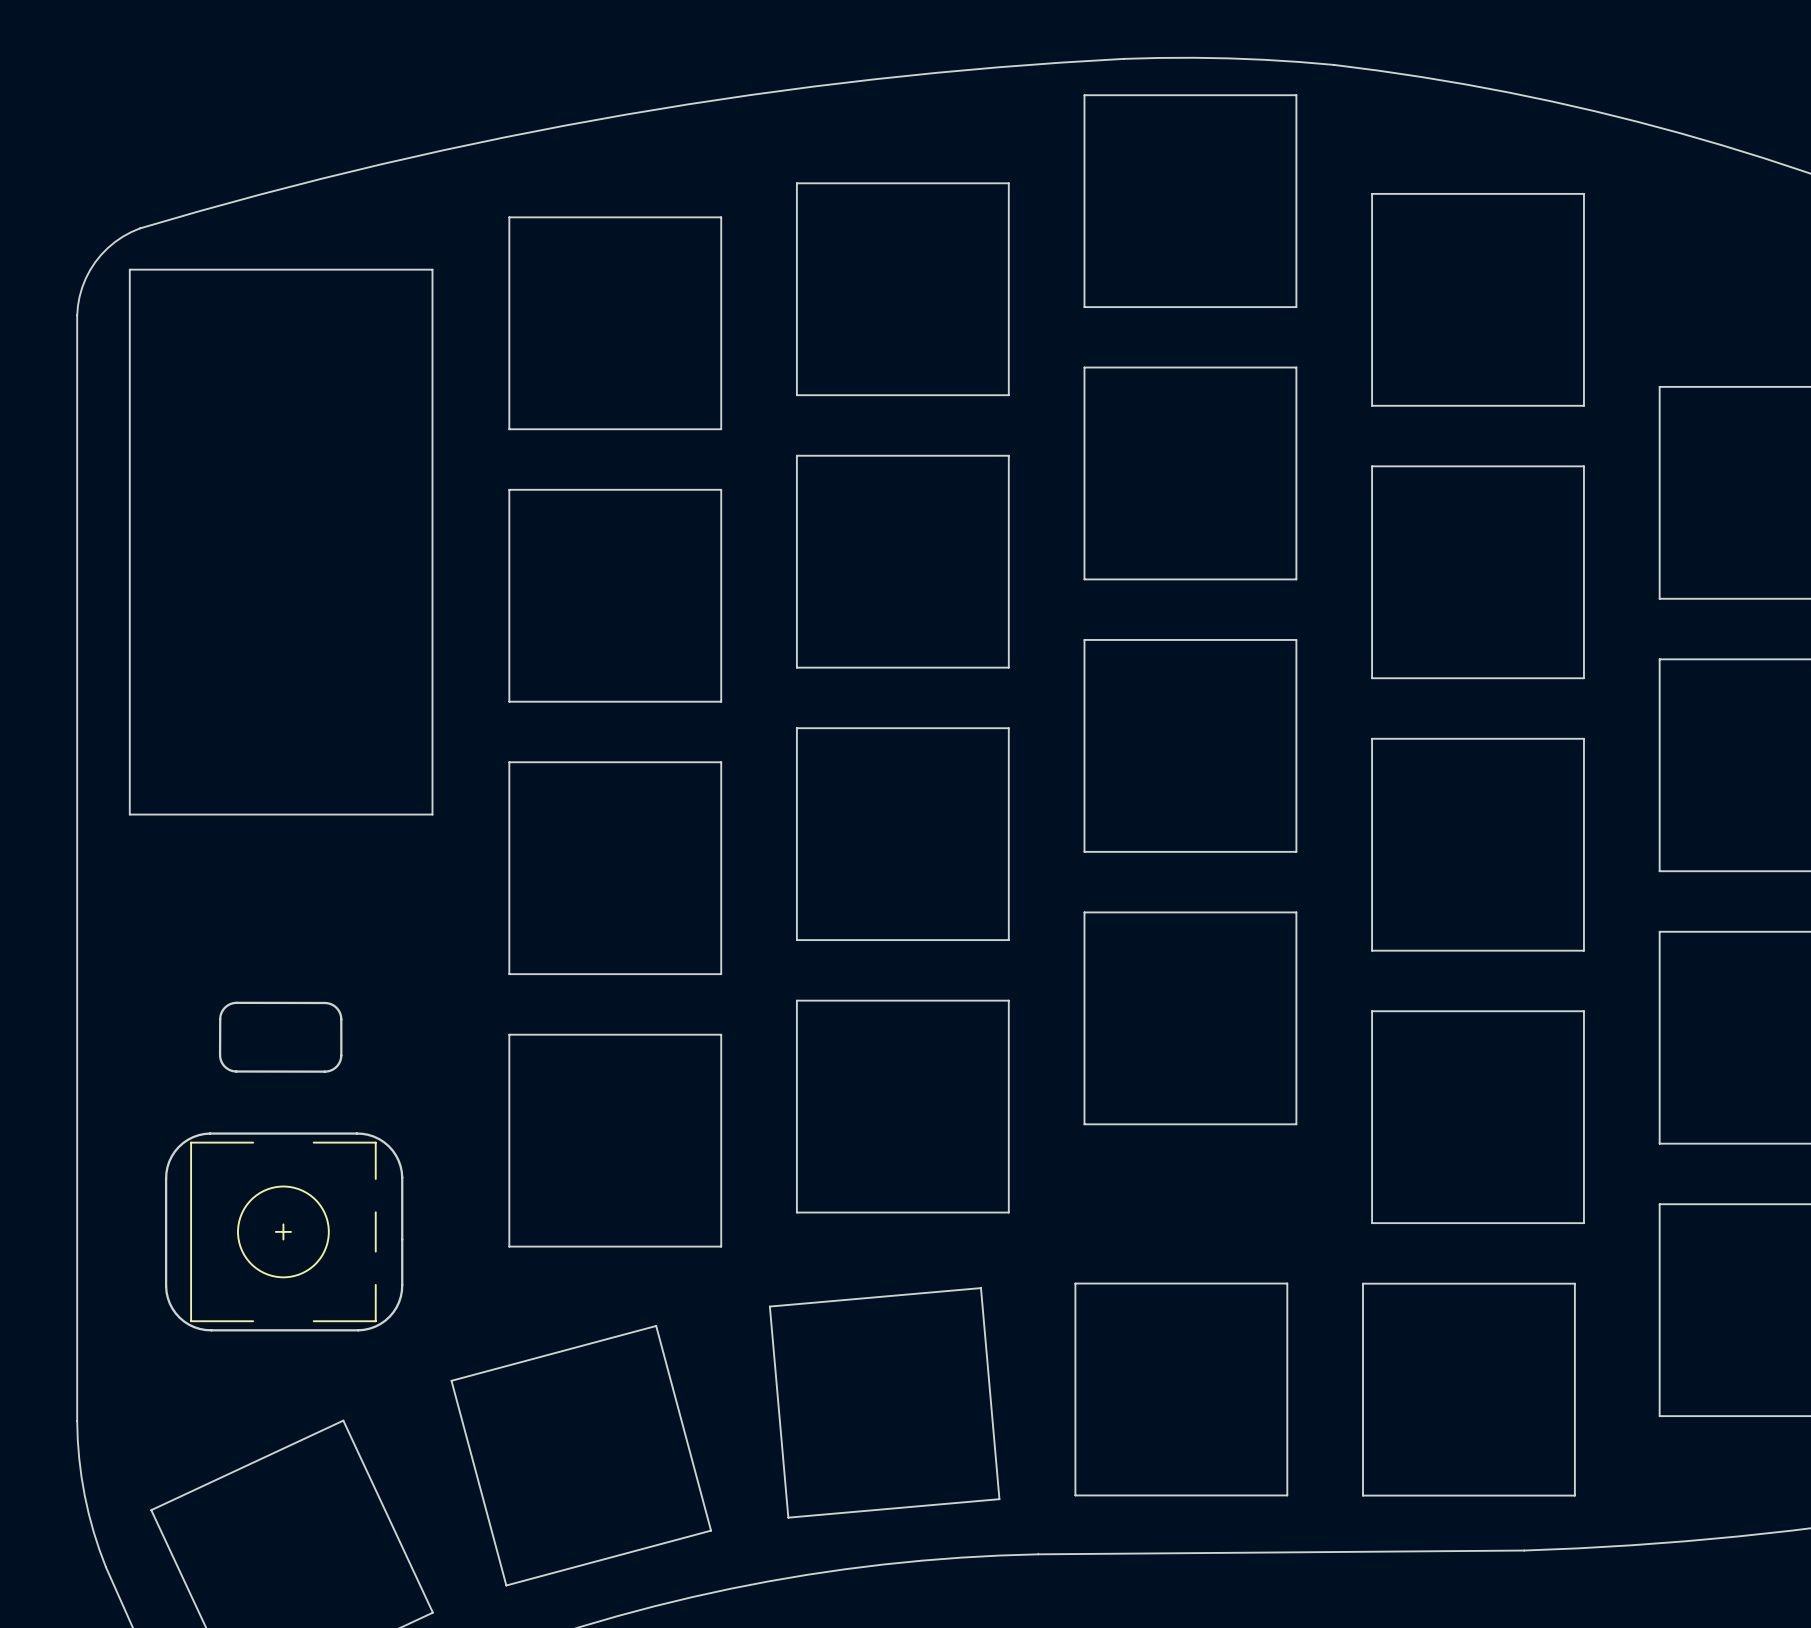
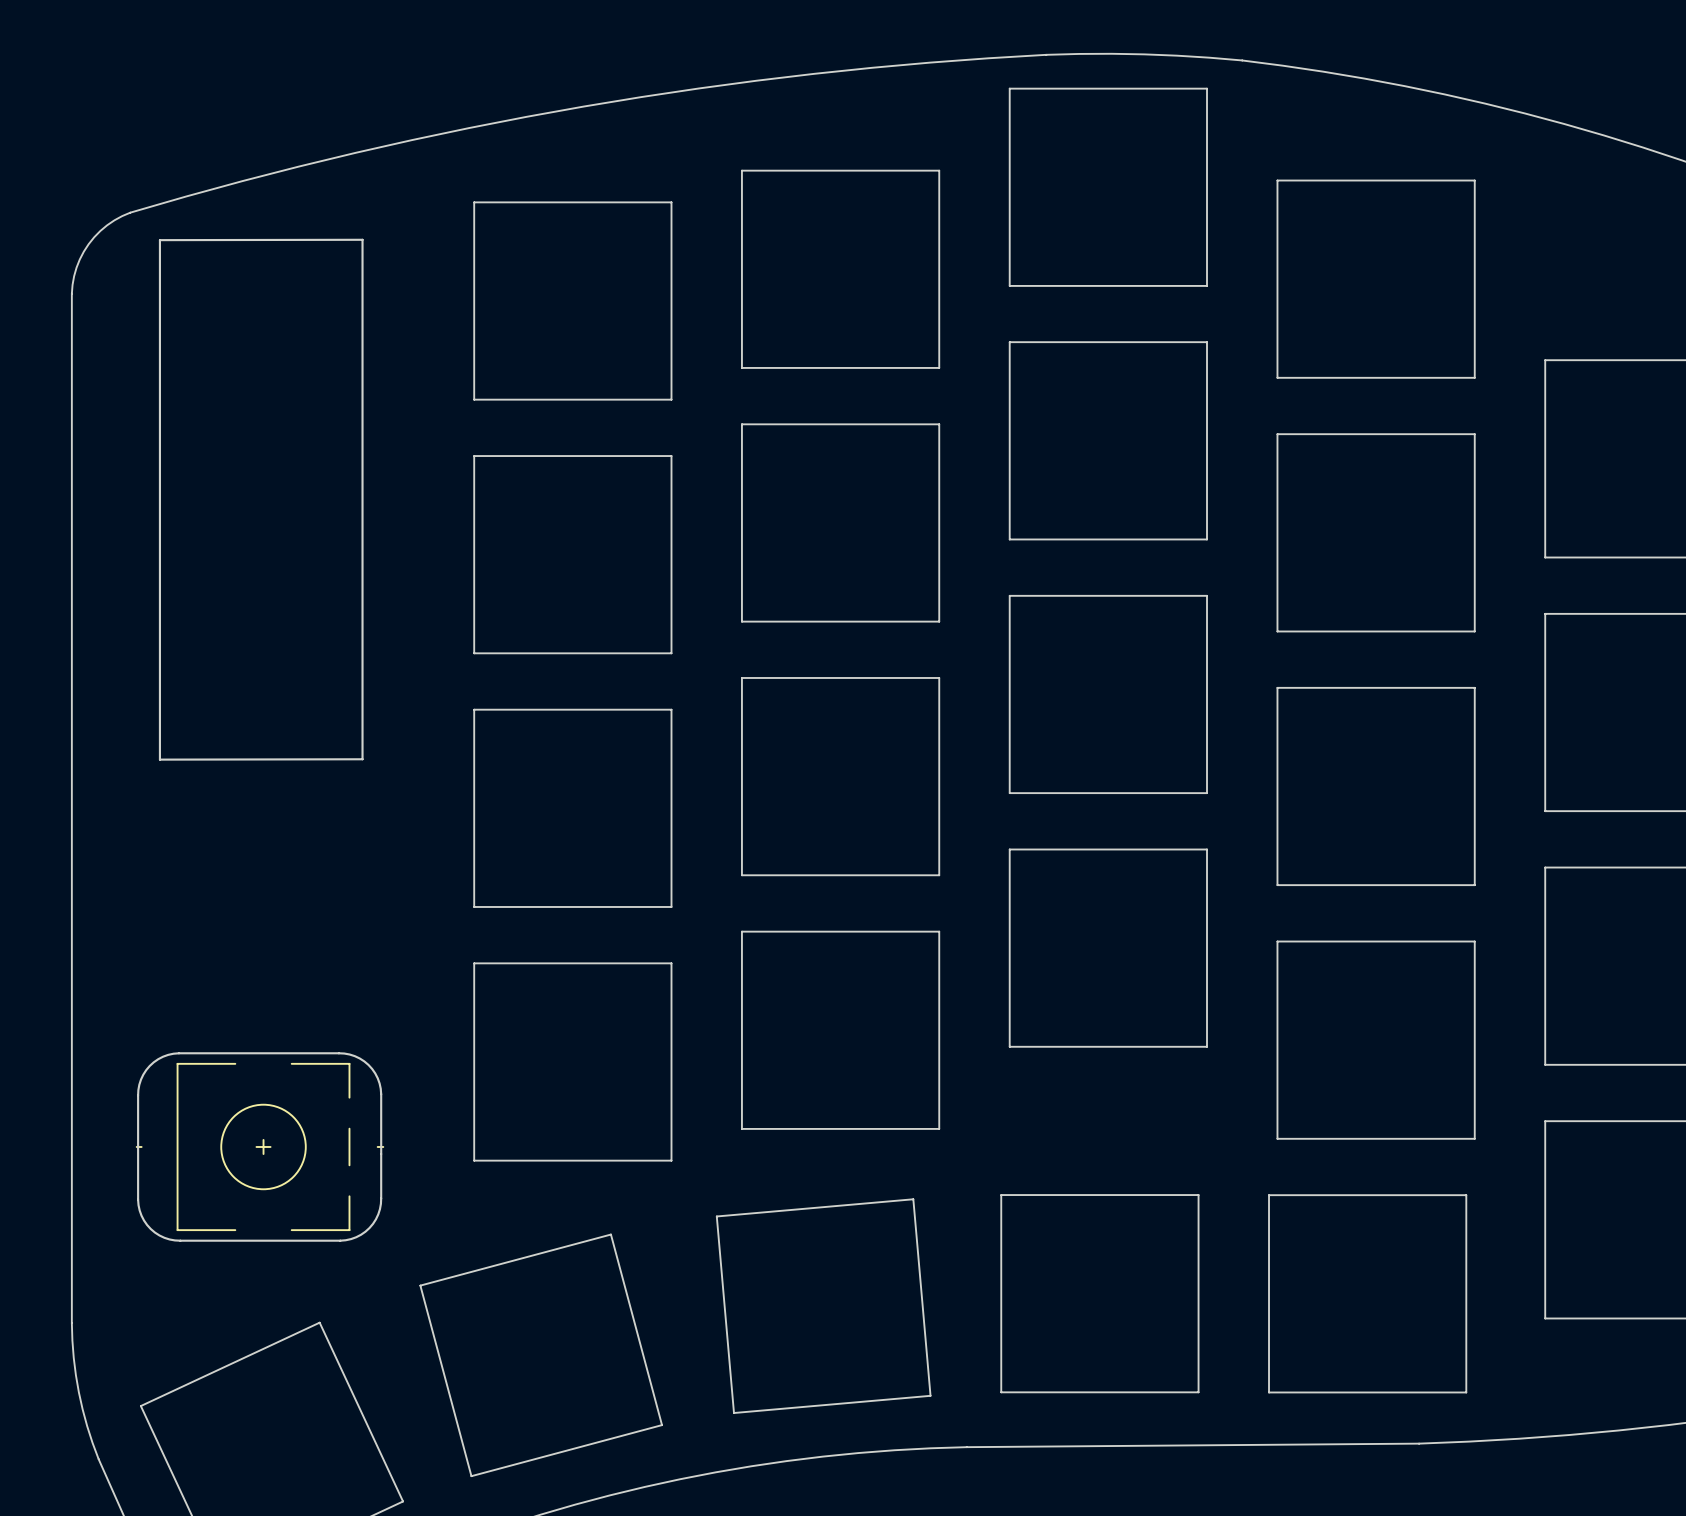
board edge: (129, 269) (432, 269) (432, 814) (129, 814) (129, 269) -> (362, 239) (159, 240) (159, 759) (362, 759) (362, 239)
board edge: (236, 1002) (325, 1002) (333, 1005) (338, 1010) (341, 1017) (341, 1055) (338, 1064) (331, 1070) (324, 1071) (236, 1071) (227, 1068) (222, 1063) (220, 1056) (220, 1017) (225, 1007) (236, 1002) -> none
drawing shape: [164, 1132, 404, 1332] -> [135, 1052, 385, 1242]

